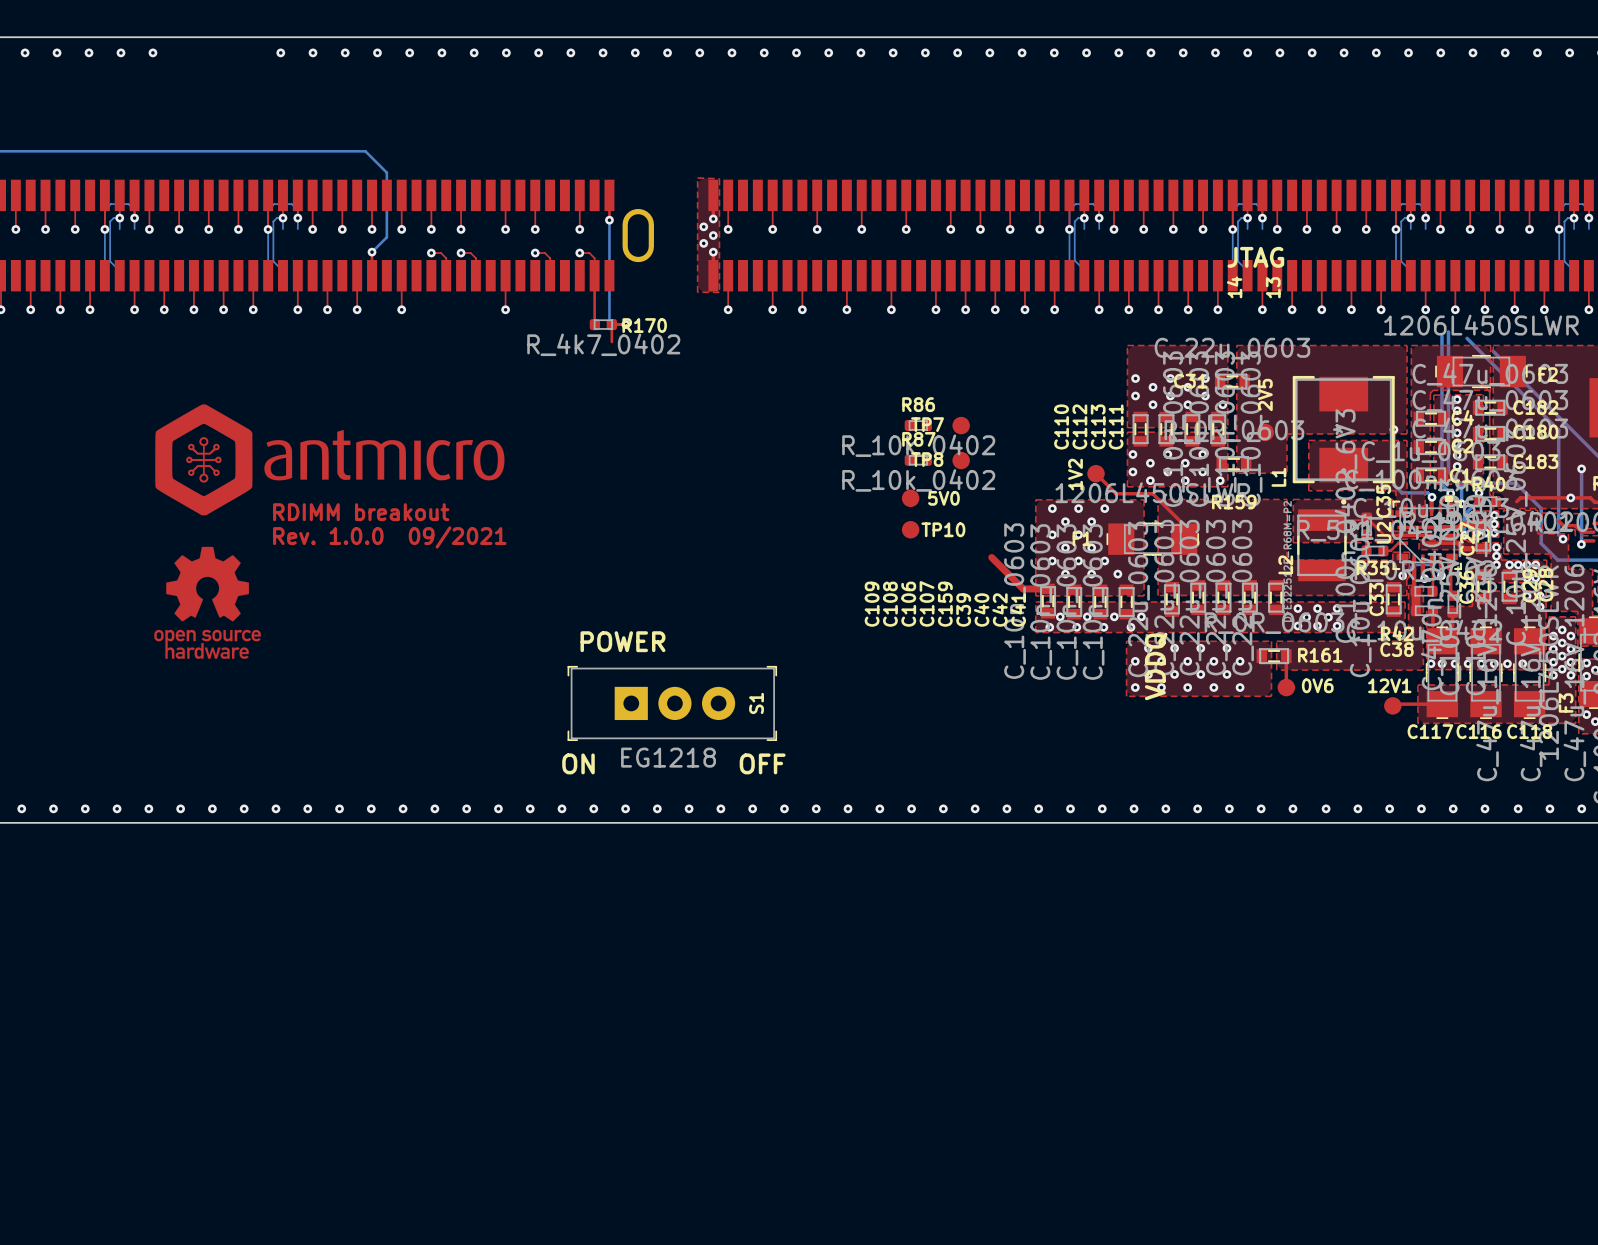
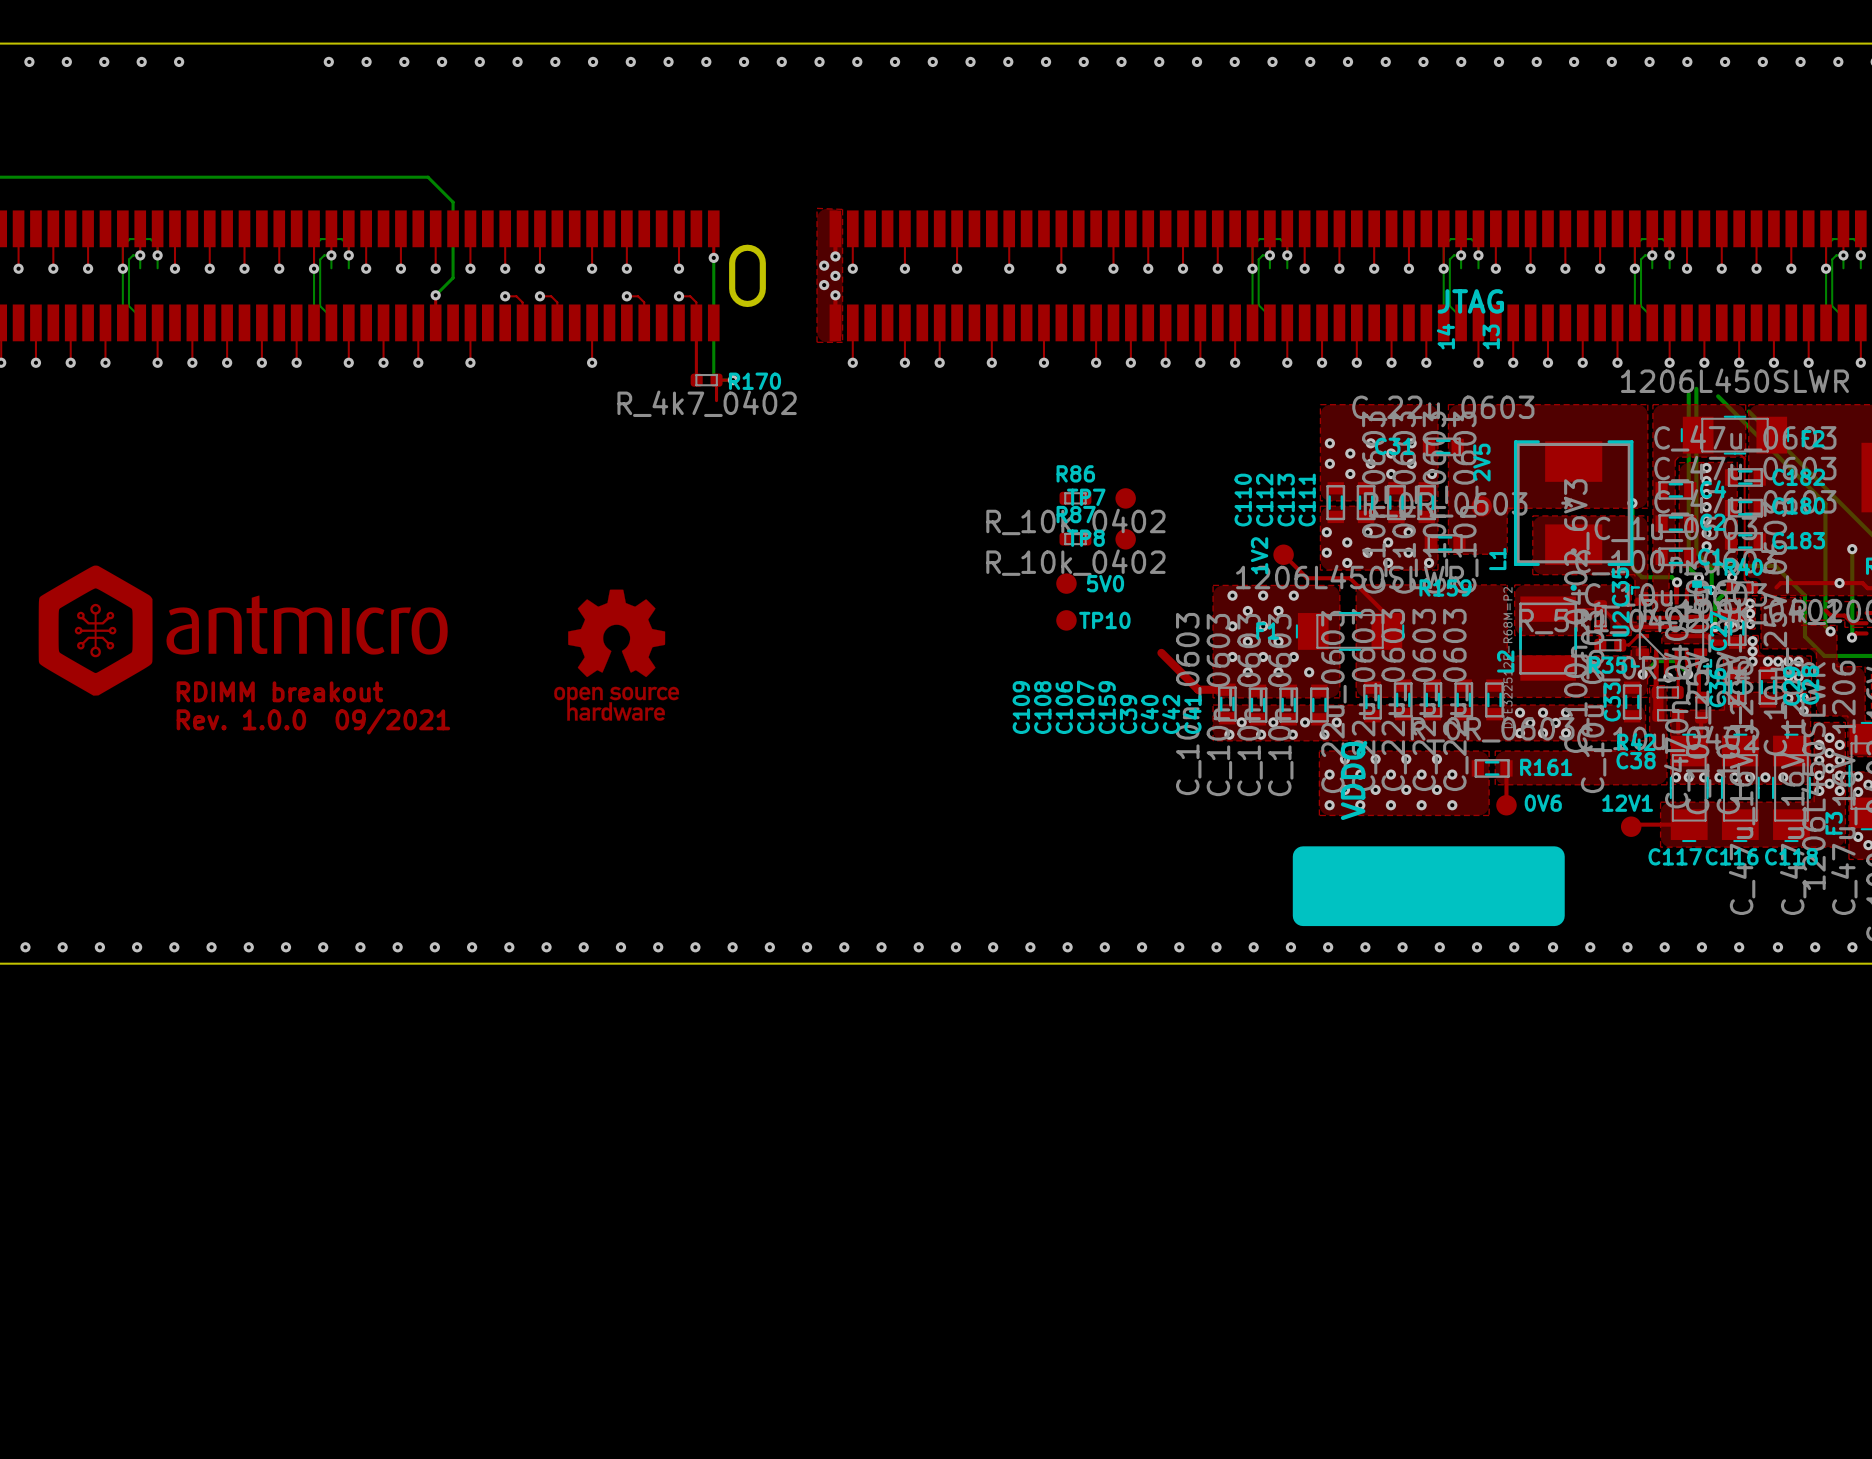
drawing position: (329, 459) -> (243, 630)
text position: RDIMM breakout (361, 512) -> RDIMM breakout (279, 691)
text position: Rev. 1.0.0 09/2021 (389, 537) -> Rev. 1.0.0 09/2021 (313, 721)
drawing position: (207, 602) -> (616, 655)
text: POWER (622, 641) -> none
S1: EG1218 (672, 703) -> none
drawing: none -> [1292, 846, 1565, 927]
text: ON (578, 763) -> none
text: OFF (762, 763) -> none

